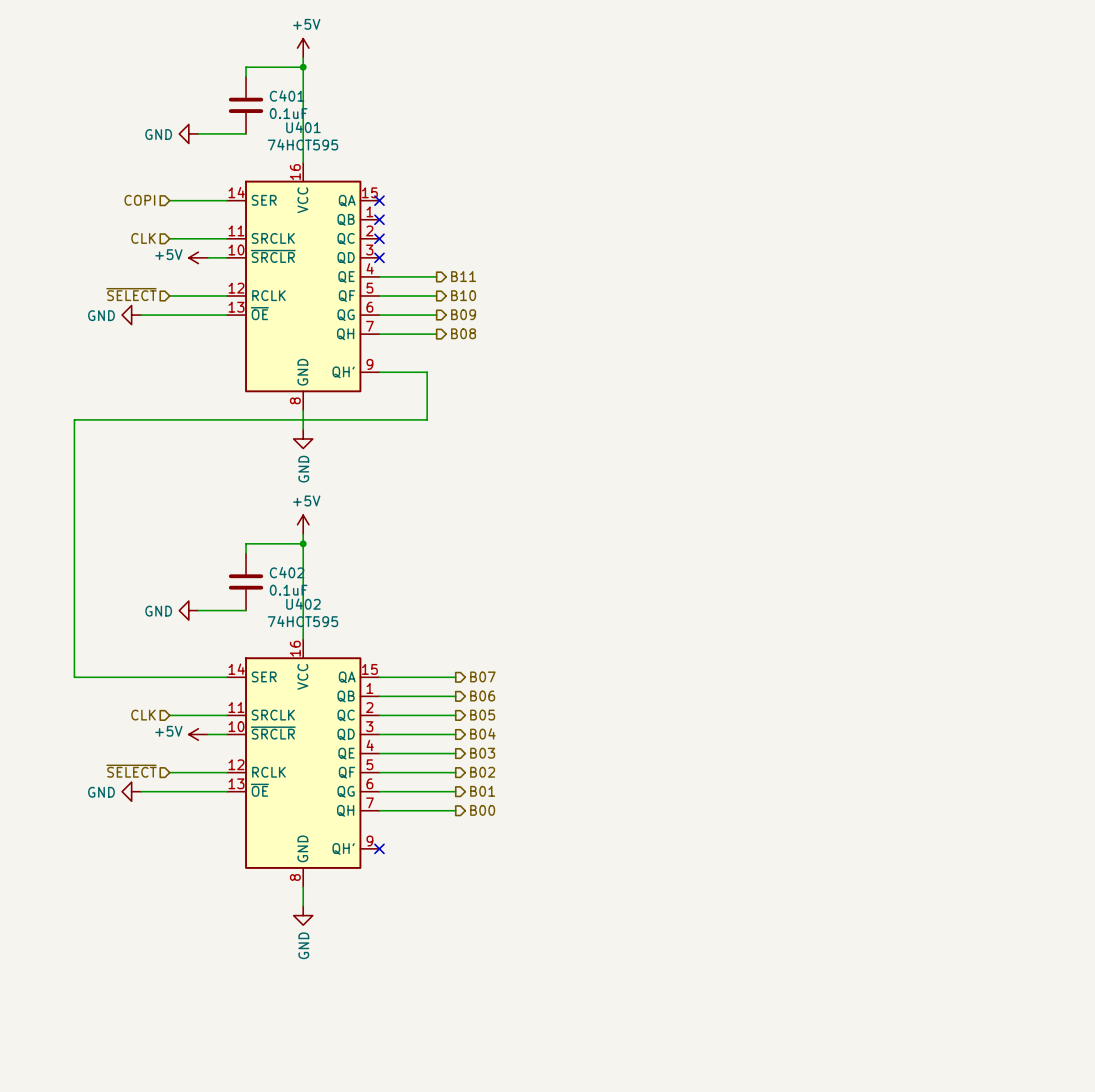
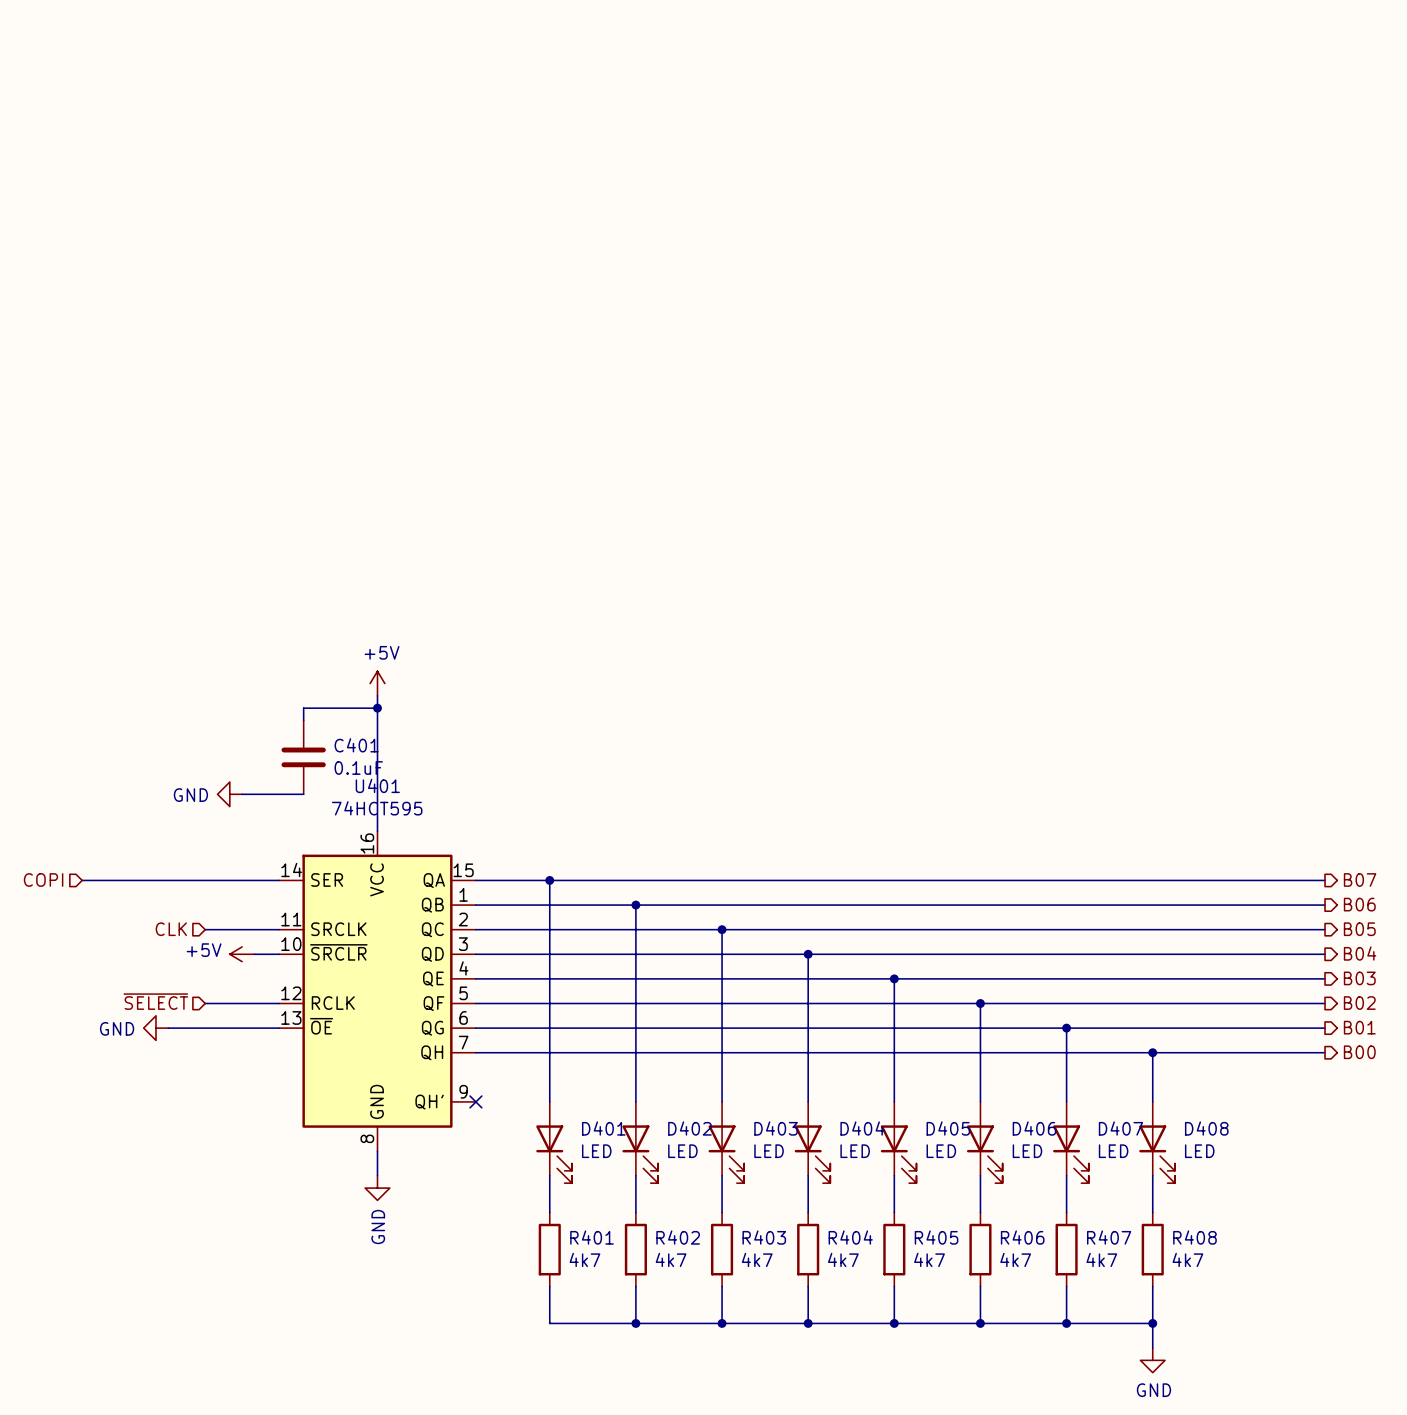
power symbol: +5V (303, 48) -> none
wire: (303, 57) (303, 162) -> none
wire: (303, 67) (246, 67) (246, 76) -> none
junction: (303, 67) -> none
C401: 0.1uF (246, 105) -> none
power symbol: GND (188, 133) -> none
wire: (198, 133) (246, 133) -> none
hierarchical label: COPI (139, 200) -> none
wire: (169, 200) (226, 200) -> none
no-connect mark: (379, 200) -> none
no-connect mark: (379, 219) -> none
hierarchical label: CLK (143, 238) -> none
wire: (169, 238) (226, 238) -> none
no-connect mark: (379, 238) -> none
power symbol: +5V (198, 257) -> none
wire: (207, 257) (226, 257) -> none
no-connect mark: (379, 257) -> none
wire: (379, 276) (436, 276) -> none
hierarchical label: B11 (463, 276) -> none
U401: 74HCT595 (303, 286) -> none
hierarchical label: ~{SELECT} (131, 294) -> none
wire: (169, 295) (226, 295) -> none
wire: (379, 295) (436, 295) -> none
hierarchical label: B10 (463, 295) -> none
hierarchical label: B09 (463, 314) -> none
power symbol: GND (131, 315) -> none
wire: (141, 315) (226, 315) -> none
wire: (379, 315) (436, 315) -> none
hierarchical label: B08 (463, 333) -> none
wire: (379, 334) (436, 334) -> none
wire: (379, 372) (427, 372) (427, 419) (74, 419) (74, 677) -> none
wire: (303, 410) (303, 429) -> none
power symbol: GND (303, 438) -> none
C402 name: C402 (287, 572) -> C401 (356, 745)
U402 name: U402 (303, 604) -> U401 (377, 785)
hierarchical label: none -> COPI (43, 879)
hierarchical label: B07 (482, 676) -> none
hierarchical label: none -> B07 (1360, 879)
wire: none -> (549, 880) (549, 1101)
junction: none -> (549, 880)
wire: none -> (574, 880) (1325, 880)
wire: none -> (574, 905) (1325, 905)
hierarchical label: B06 (482, 696) -> none
wire: none -> (635, 905) (635, 1101)
junction: none -> (635, 905)
hierarchical label: none -> B06 (1359, 904)
wire: none -> (574, 929) (1325, 929)
hierarchical label: B05 (482, 715) -> none
wire: none -> (722, 929) (722, 1101)
junction: none -> (722, 929)
hierarchical label: none -> B05 (1359, 929)
hierarchical label: B04 (482, 733) -> none
hierarchical label: none -> B04 (1360, 953)
wire: none -> (574, 954) (1325, 954)
wire: none -> (808, 954) (808, 1101)
junction: none -> (808, 954)
wire: none -> (574, 978) (1325, 978)
hierarchical label: B03 (482, 753) -> none
wire: none -> (894, 978) (894, 1101)
junction: none -> (894, 978)
hierarchical label: none -> B03 (1359, 978)
wire: none -> (574, 1003) (1325, 1003)
hierarchical label: B02 (482, 772) -> none
wire: none -> (980, 1003) (980, 1101)
junction: none -> (980, 1003)
hierarchical label: none -> B02 (1359, 1003)
wire: none -> (574, 1028) (1325, 1028)
hierarchical label: B01 (482, 791) -> none
wire: none -> (1066, 1028) (1066, 1101)
junction: none -> (1066, 1028)
hierarchical label: none -> B01 (1359, 1027)
wire: none -> (574, 1052) (1325, 1052)
hierarchical label: B00 (482, 810) -> none
wire: none -> (1152, 1052) (1152, 1101)
junction: none -> (1152, 1052)
hierarchical label: none -> B00 (1359, 1052)
D401: none -> LED (554, 1142)
D402: none -> LED (640, 1142)
D403: none -> LED (726, 1142)
D404: none -> LED (812, 1142)
D405: none -> LED (898, 1142)
D406: none -> LED (984, 1142)
D407: none -> LED (1070, 1142)
D408: none -> LED (1157, 1142)
wire: none -> (549, 1175) (549, 1212)
wire: none -> (635, 1175) (635, 1212)
wire: none -> (722, 1175) (722, 1212)
wire: none -> (808, 1175) (808, 1212)
wire: none -> (894, 1175) (894, 1212)
wire: none -> (980, 1175) (980, 1212)
wire: none -> (1066, 1175) (1066, 1212)
wire: none -> (1152, 1175) (1152, 1212)
R401: none -> 4k7 (549, 1249)
R402: none -> 4k7 (635, 1249)
R403: none -> 4k7 (722, 1249)
R404: none -> 4k7 (808, 1249)
R405: none -> 4k7 (894, 1249)
R406: none -> 4k7 (980, 1249)
R407: none -> 4k7 (1066, 1249)
R408: none -> 4k7 (1152, 1249)
wire: none -> (549, 1286) (549, 1323) (1152, 1323)
wire: none -> (635, 1286) (635, 1323)
wire: none -> (722, 1286) (722, 1323)
wire: none -> (808, 1286) (808, 1323)
wire: none -> (894, 1286) (894, 1323)
wire: none -> (980, 1286) (980, 1323)
wire: none -> (1066, 1286) (1066, 1323)
wire: none -> (1152, 1286) (1152, 1348)
junction: none -> (635, 1323)
junction: none -> (722, 1323)
junction: none -> (808, 1323)
junction: none -> (894, 1323)
junction: none -> (980, 1323)
junction: none -> (1066, 1323)
junction: none -> (1152, 1323)
power symbol: none -> GND (1152, 1360)

